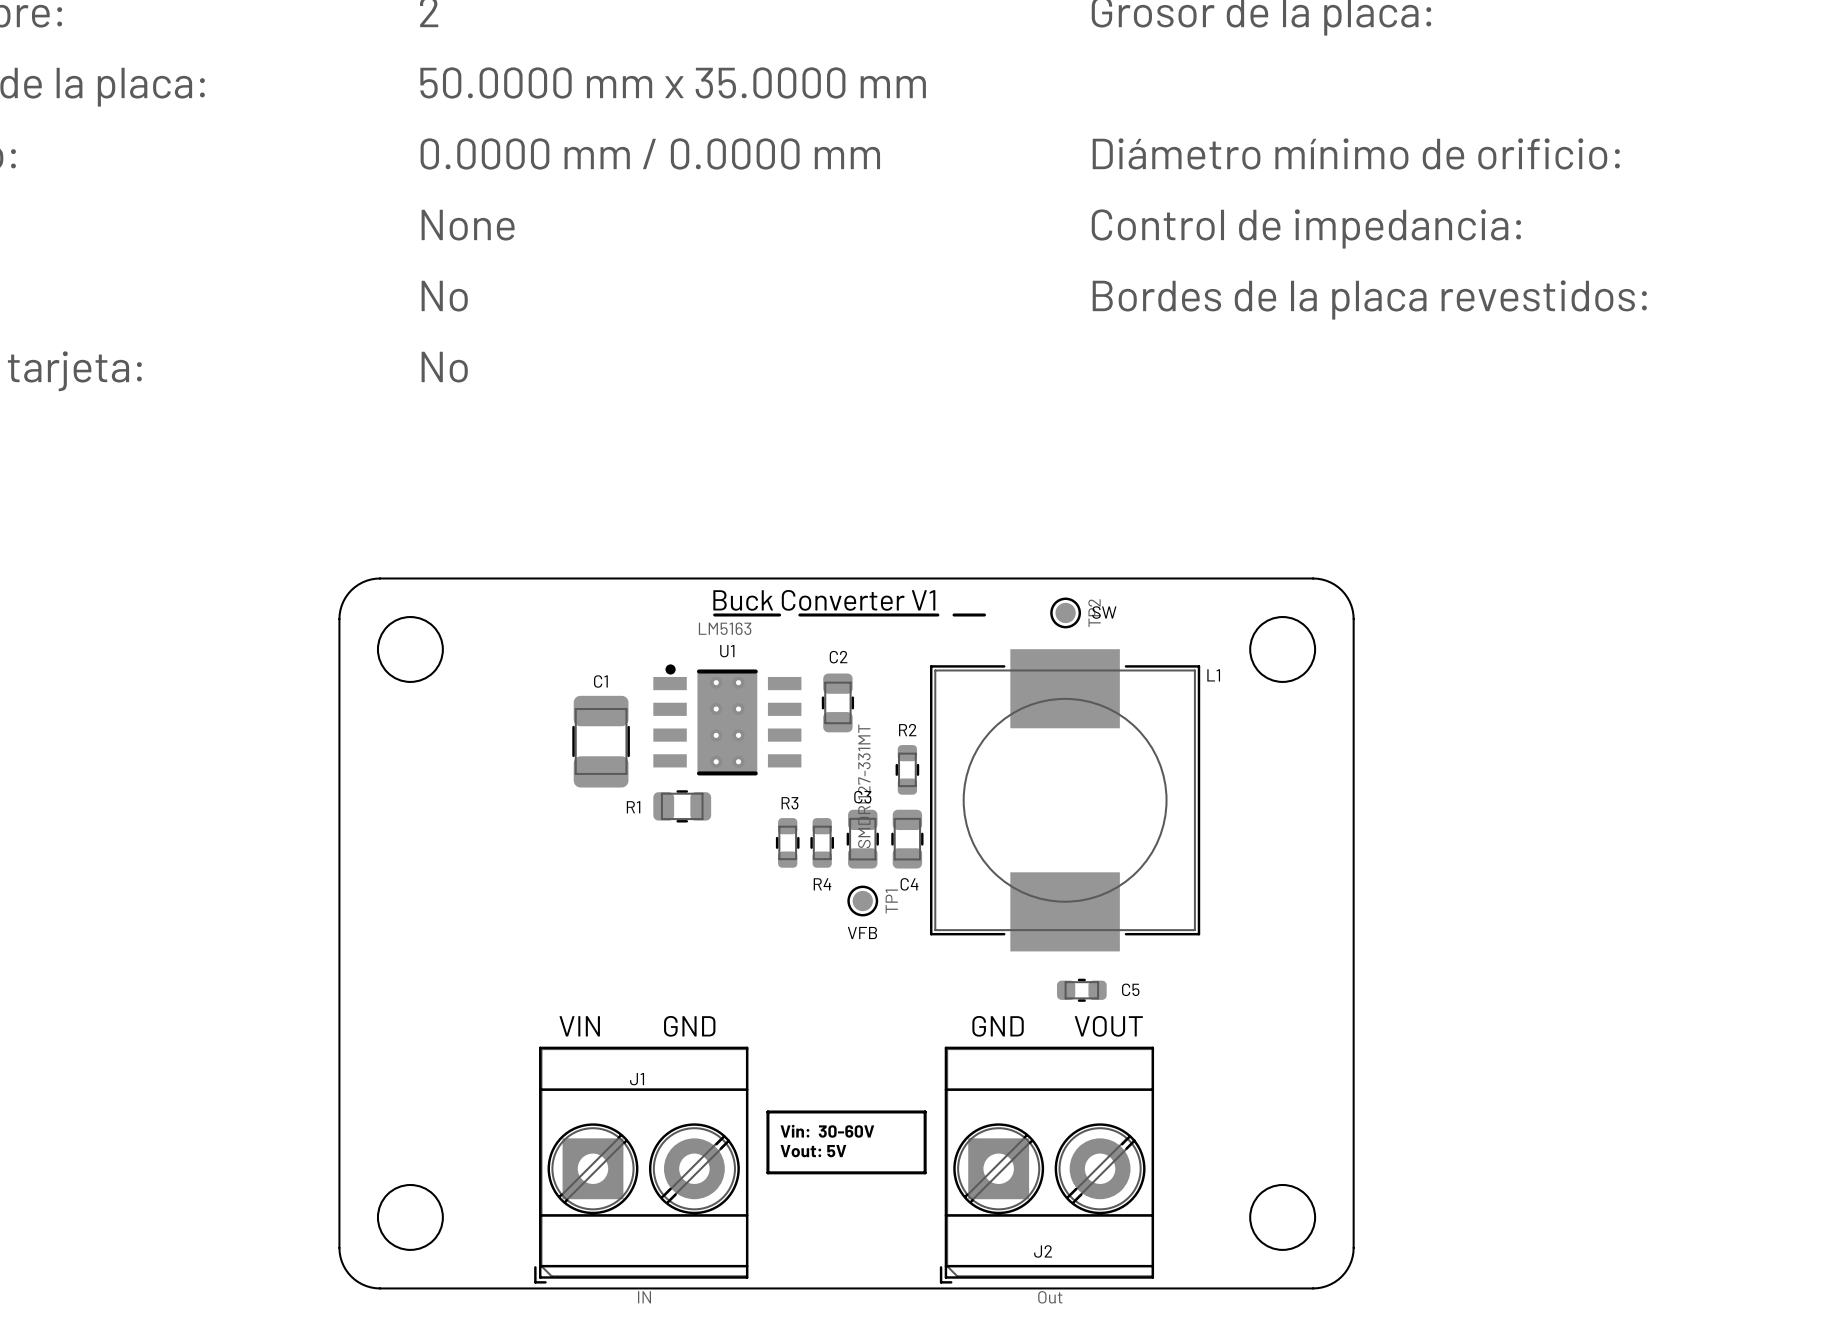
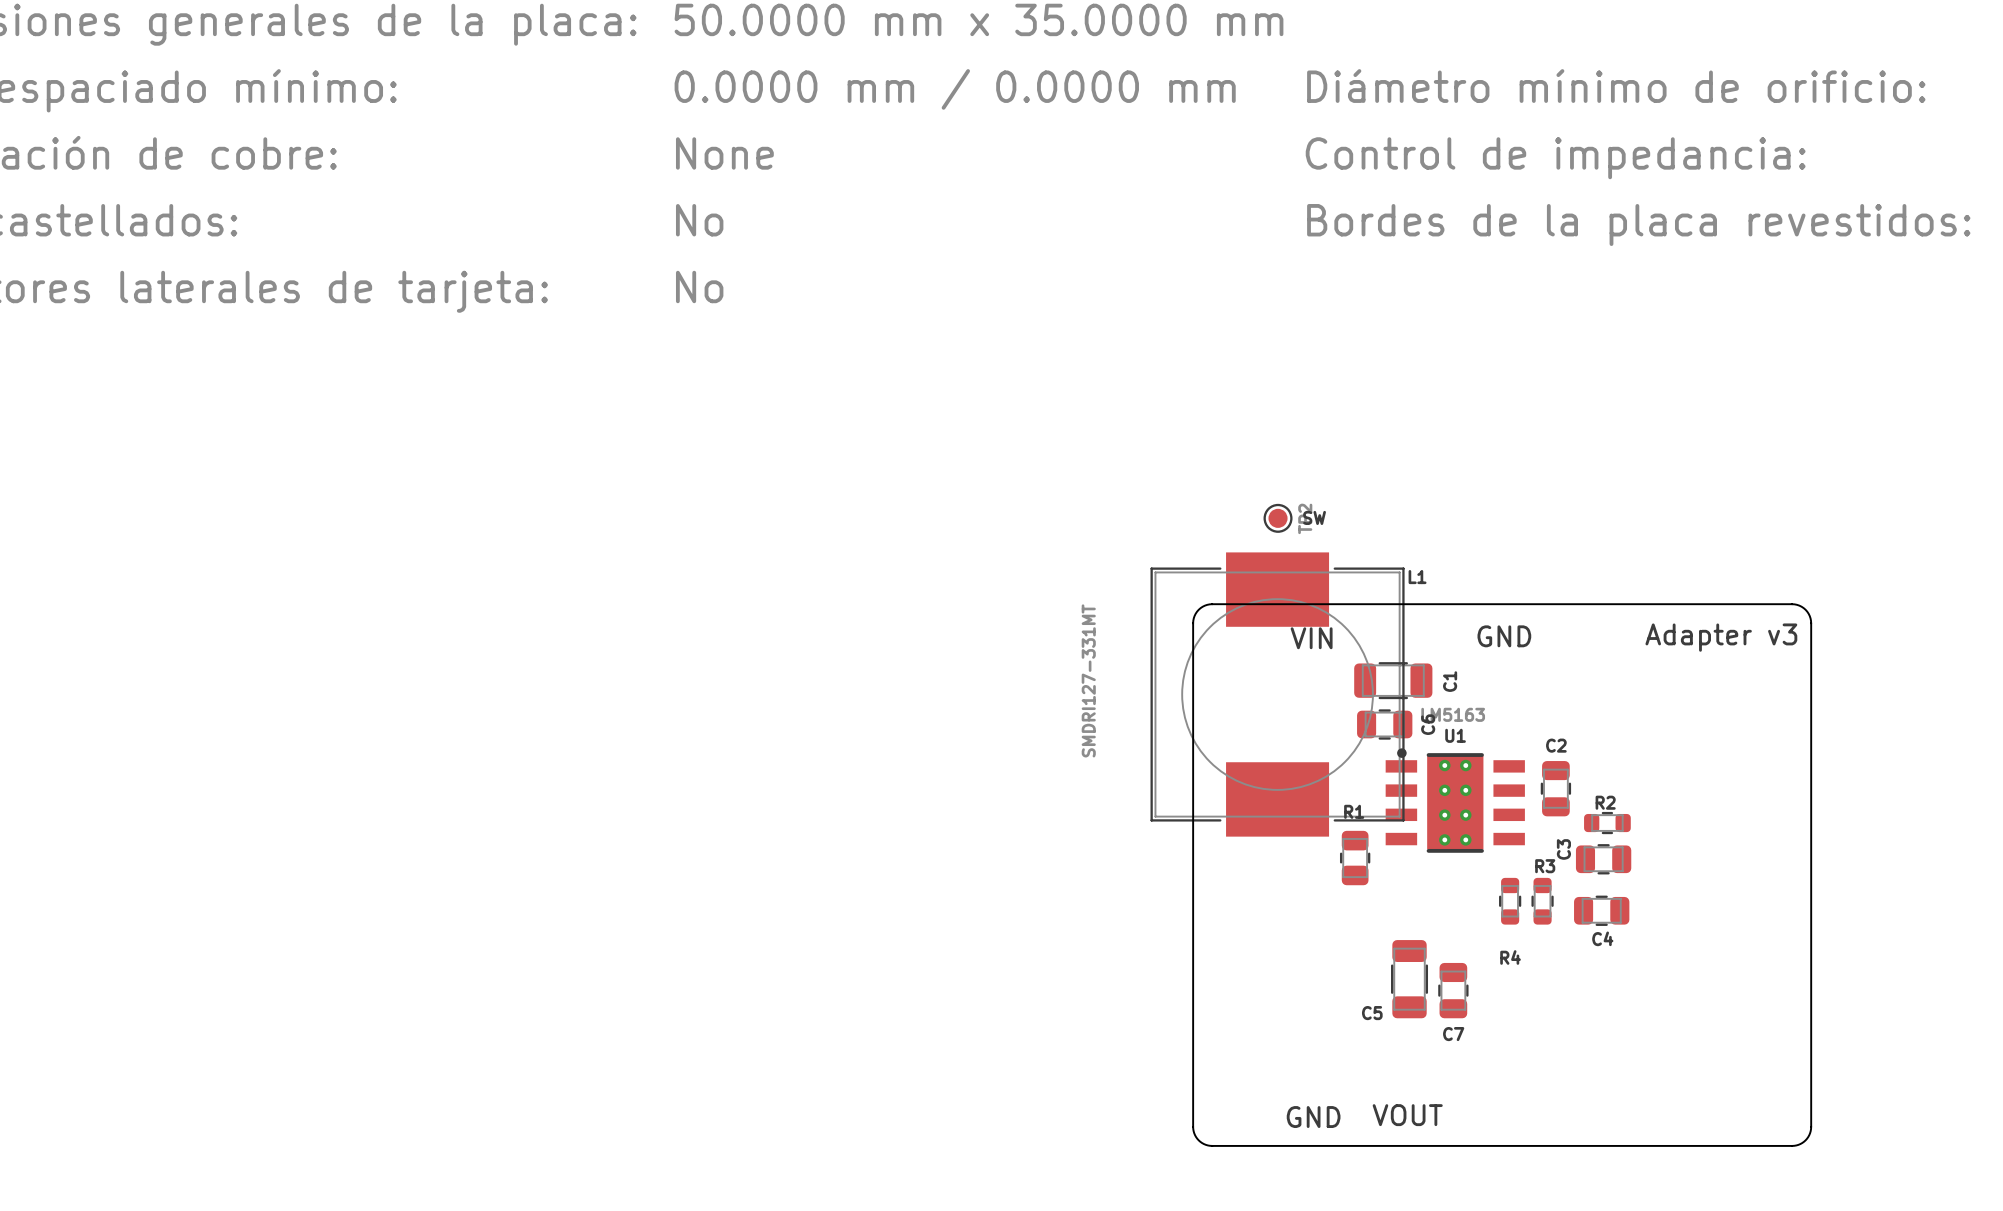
board edge: (379, 578) (1313, 578) (1326, 580) (1338, 587) (1349, 601) (1353, 619) (1353, 1247) (1351, 1261) (1344, 1273) (1330, 1284) (1313, 1288) (379, 1288) (366, 1286) (354, 1279) (343, 1265) (339, 1247) (339, 619) (341, 605) (351, 590) (362, 582) (379, 578) -> none
text: Buck Converter V1 (824, 600) -> none
line: (714, 615) (779, 615) -> none
line: (799, 615) (937, 615) -> none
line: (954, 615) (984, 615) -> none
round board edge: [376, 616, 444, 683] -> none
round board edge: [1249, 616, 1317, 683] -> none
C1 name position: C1 (600, 681) -> C1 (1450, 681)
C1 footprint: [572, 695, 630, 788] -> [1354, 662, 1433, 700]
C2 position: (837, 702) -> (1555, 788)
board edge: none -> (1212, 604) (1792, 604) (1805, 609) (1811, 623) (1811, 1126) (1805, 1140) (1792, 1145) (1212, 1145) (1198, 1140) (1193, 1126) (1193, 623) (1198, 609) (1212, 604)
U1 position: (727, 719) -> (1455, 800)
text: none -> GND (1504, 636)
text: none -> Adapter v3 (1721, 637)
text: none -> VIN (1311, 638)
R2 rotation: 0° (907, 769) -> 90° clockwise (1607, 823)
R2 position: (907, 769) -> (1607, 823)
R3 name position: R3 (789, 803) -> R3 (1545, 866)
R1 rotation: 0° (682, 806) -> 90° clockwise (1355, 858)
R1 position: (682, 806) -> (1355, 858)
C6: none -> (1384, 724)
C4 rotation: 0° (862, 839) -> 90° clockwise (1601, 910)
C4 position: (862, 839) -> (1601, 910)
C3 rotation: 0° (907, 839) -> 90° clockwise (1603, 859)
C3 position: (907, 839) -> (1603, 859)
R4 position: (787, 842) -> (1510, 901)
R3 position: (822, 842) -> (1542, 901)
R4 name position: R4 (822, 884) -> R4 (1510, 957)
C4 name position: C4 (909, 884) -> C4 (1602, 938)
TP1: VFB (862, 901) -> none
C5 footprint: [1056, 978, 1107, 1002] -> [1391, 940, 1429, 1019]
C5 name position: C5 (1130, 989) -> C5 (1372, 1013)
text: VIN (579, 1026) -> none
text: GND (689, 1026) -> none
text: GND (998, 1026) -> none
text position: VOUT (1108, 1026) -> VOUT (1407, 1115)
line: (767, 1111) (925, 1111) (925, 1172) (767, 1172) (767, 1111) -> none
C7: none -> (1453, 990)
text: Vin: 30-60V (827, 1131) -> none
text: Vout: 5V (813, 1151) -> none
J1: IN (641, 1165) -> none
J2: Out (1047, 1165) -> none
round board edge: [376, 1183, 444, 1251] -> none
round board edge: [1249, 1183, 1317, 1251] -> none
text: none -> GND (1313, 1117)

